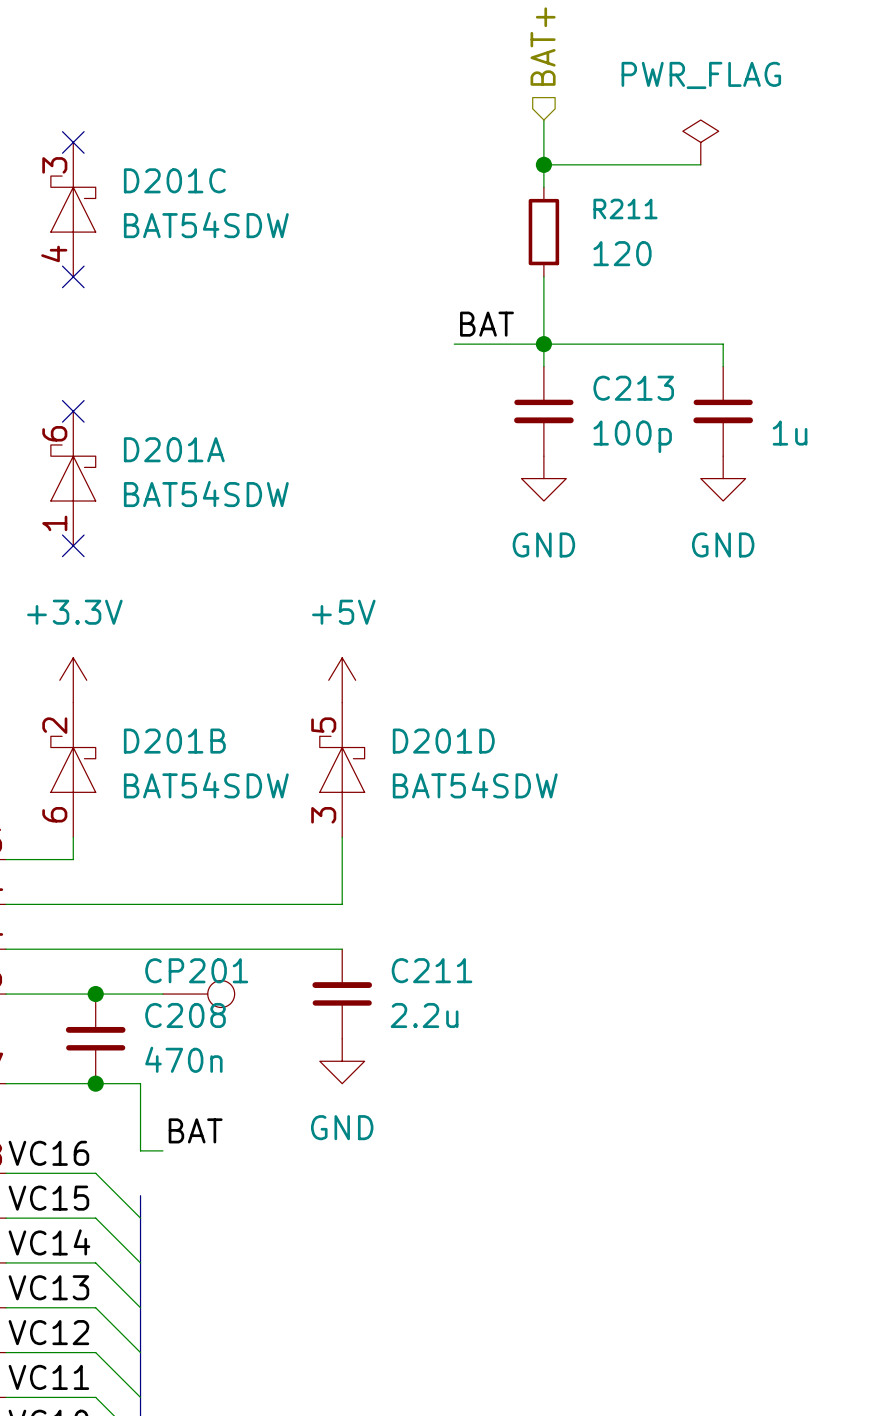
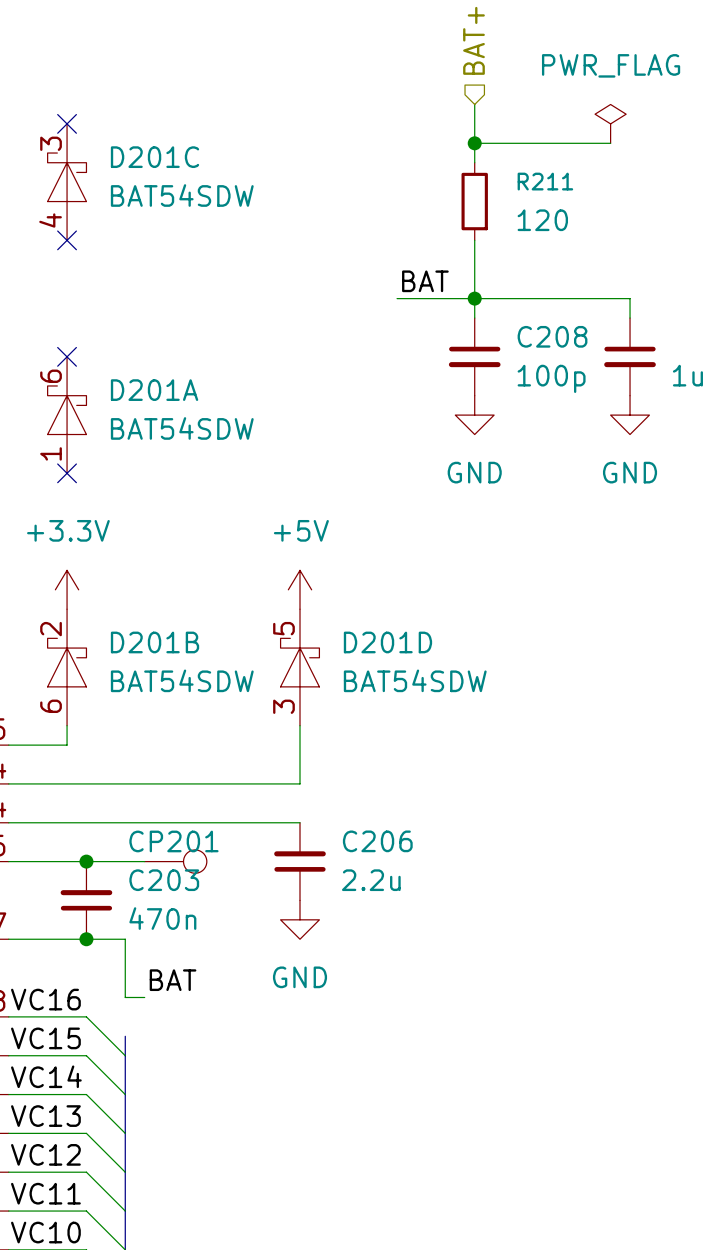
C213 name: C213 (633, 388) -> C208 (552, 336)
C211 name: C211 (432, 970) -> C206 (377, 841)
C208 name: C208 (185, 1015) -> C203 (164, 880)

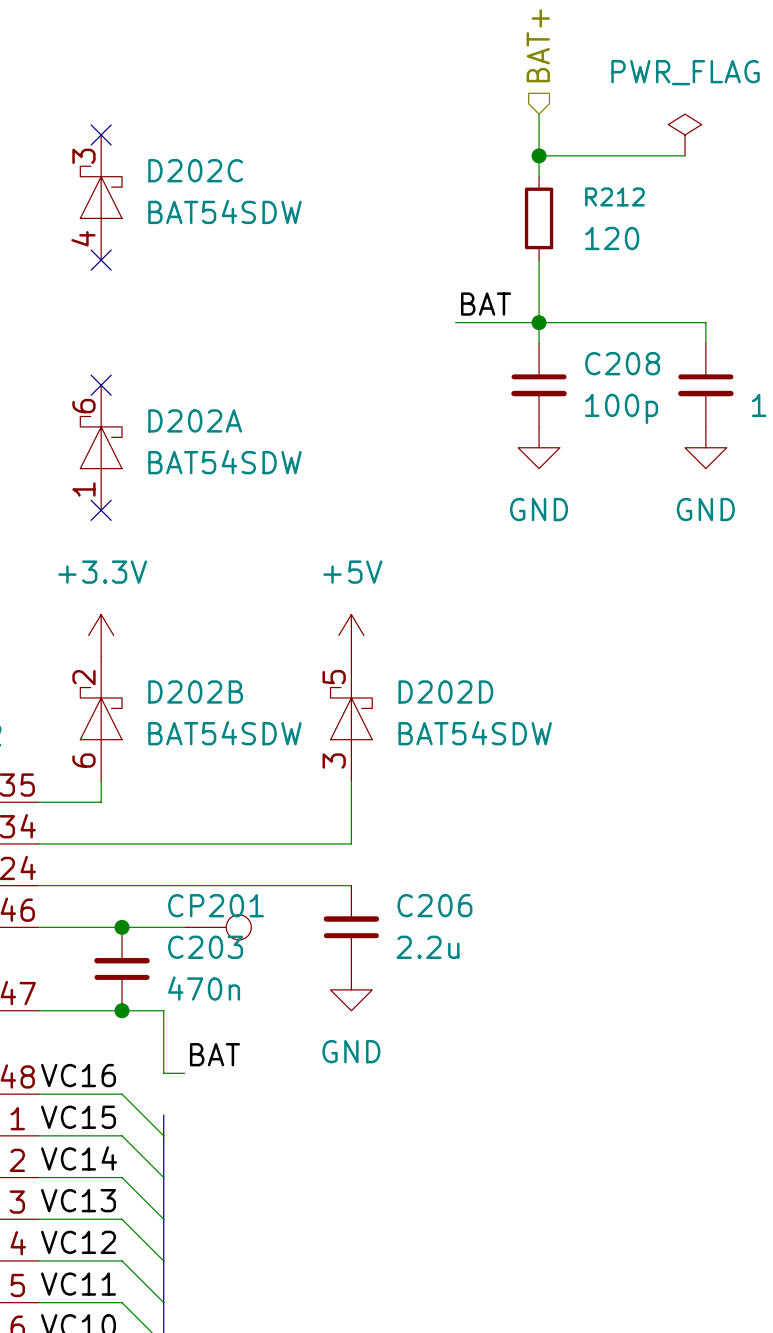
D201C name: D201C (155, 157) -> D202C (195, 170)
R211 name: R211 (545, 181) -> R212 (614, 196)
D201A name: D201A (154, 390) -> D202A (195, 420)
D201B name: D201B (155, 642) -> D202B (195, 691)
D201D name: D201D (387, 642) -> D202D (445, 691)

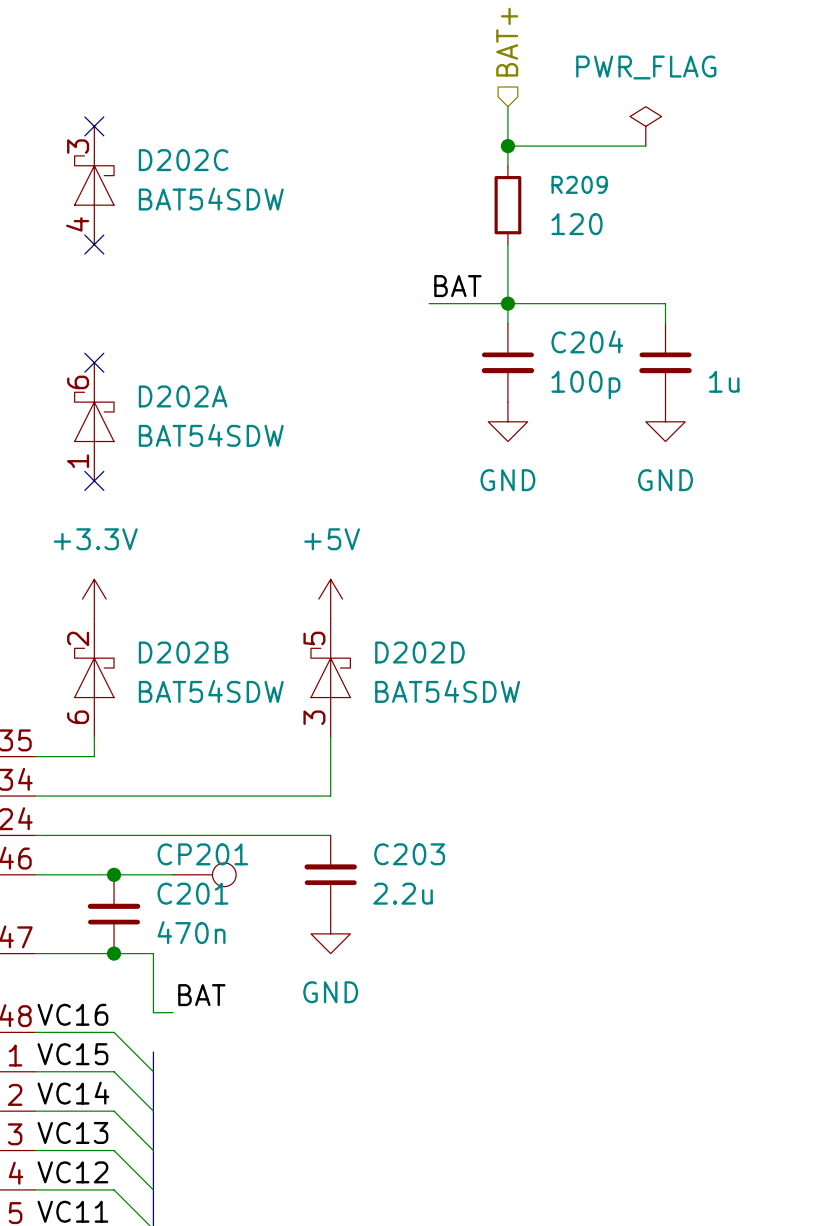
R212 name: R212 (614, 196) -> R209 (579, 184)
C208 name: C208 (622, 363) -> C204 (587, 341)
C206 name: C206 (434, 905) -> C203 (409, 854)
C203 name: C203 (205, 947) -> C201 (192, 893)

